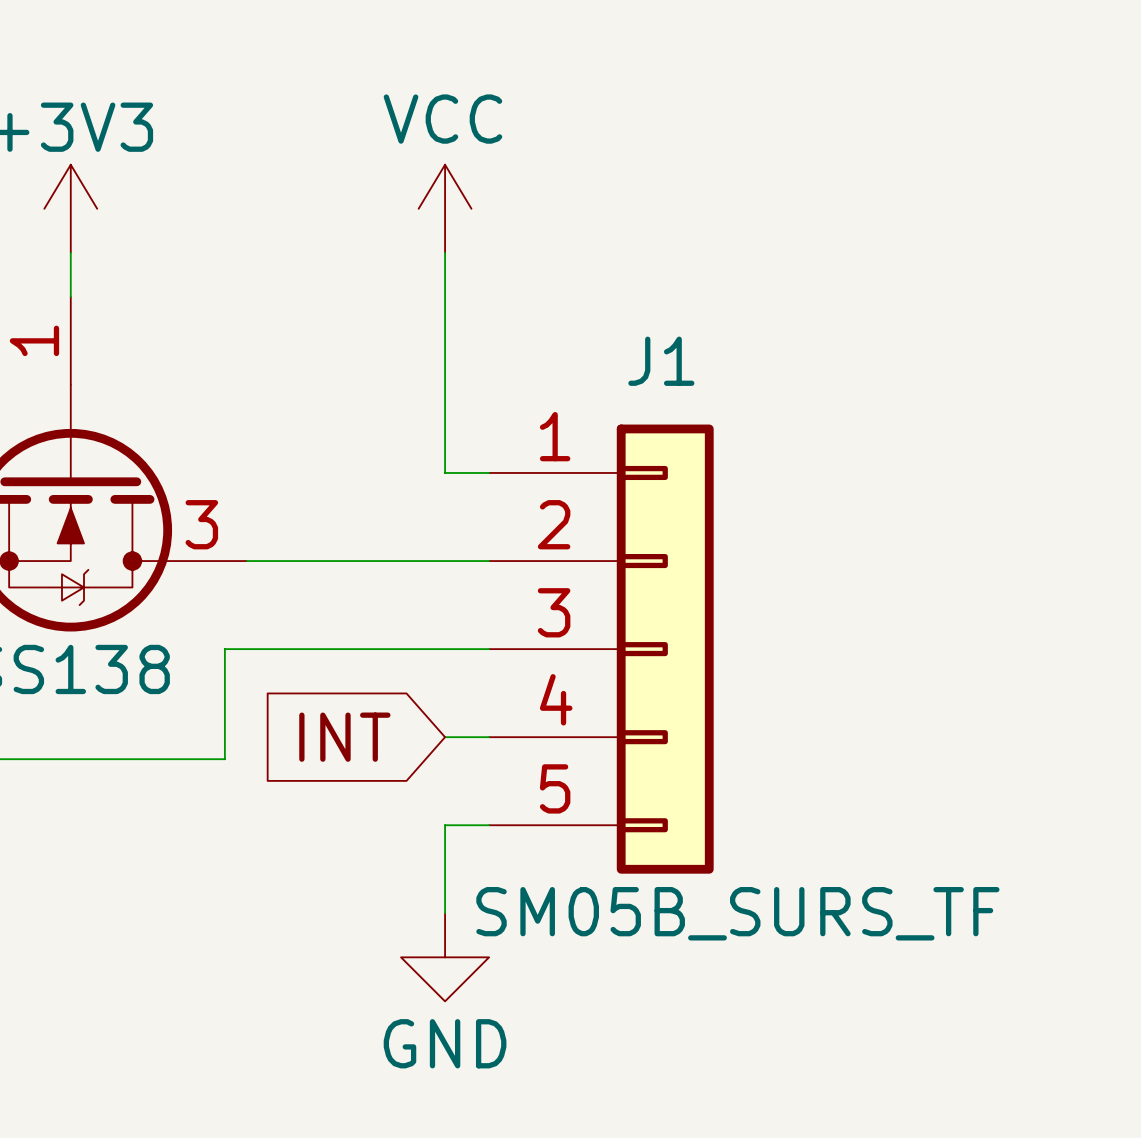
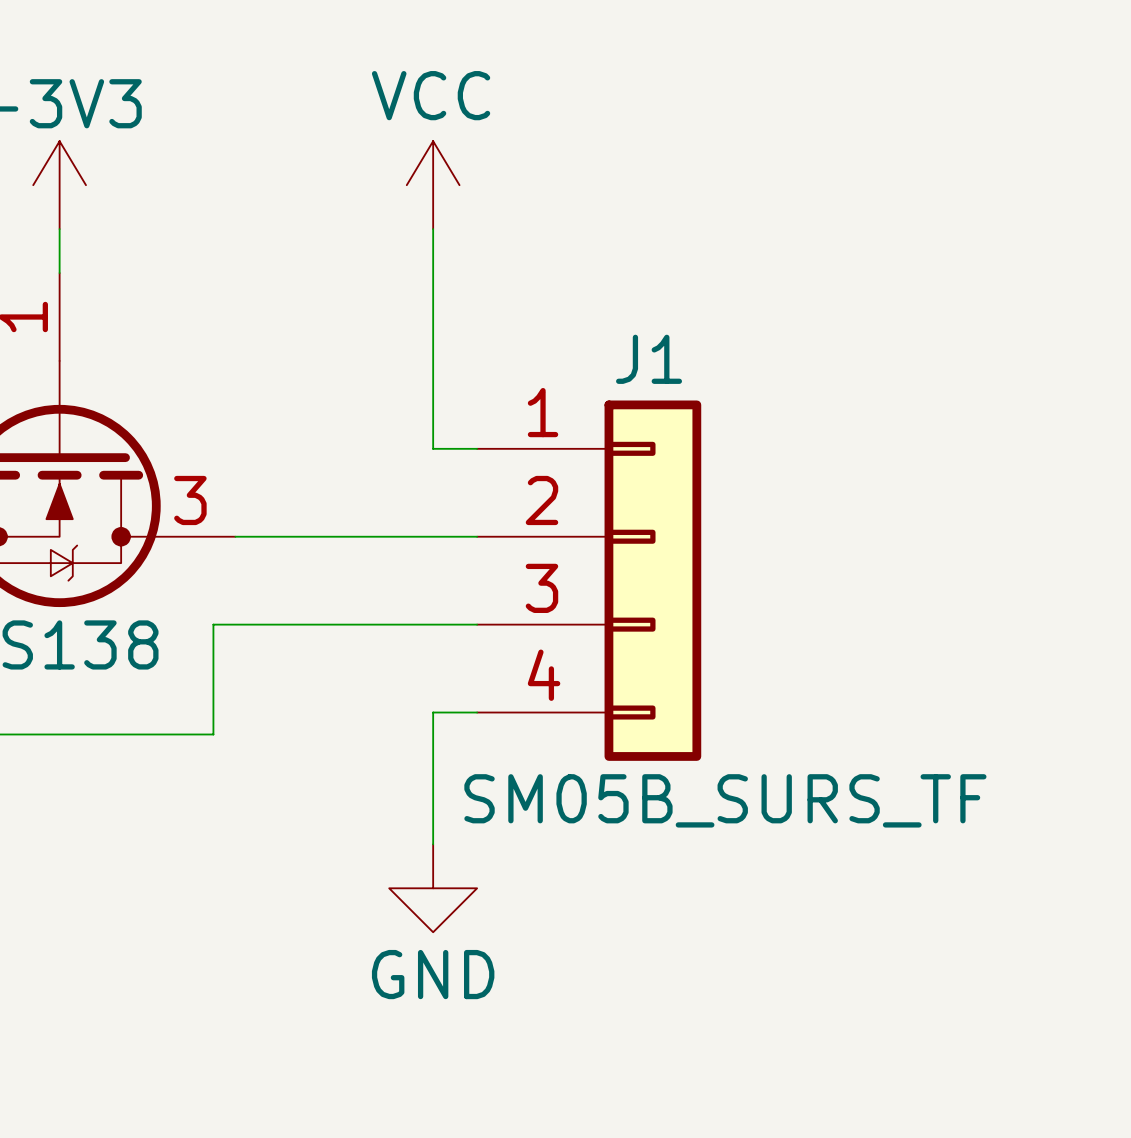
J1 symbol: [489, 424, 714, 874] -> [477, 400, 702, 761]
global label: INT (344, 737) -> none
wire: (445, 825) (489, 825) -> (433, 800) (433, 712)
power symbol position: GND (445, 957) -> GND (433, 888)

